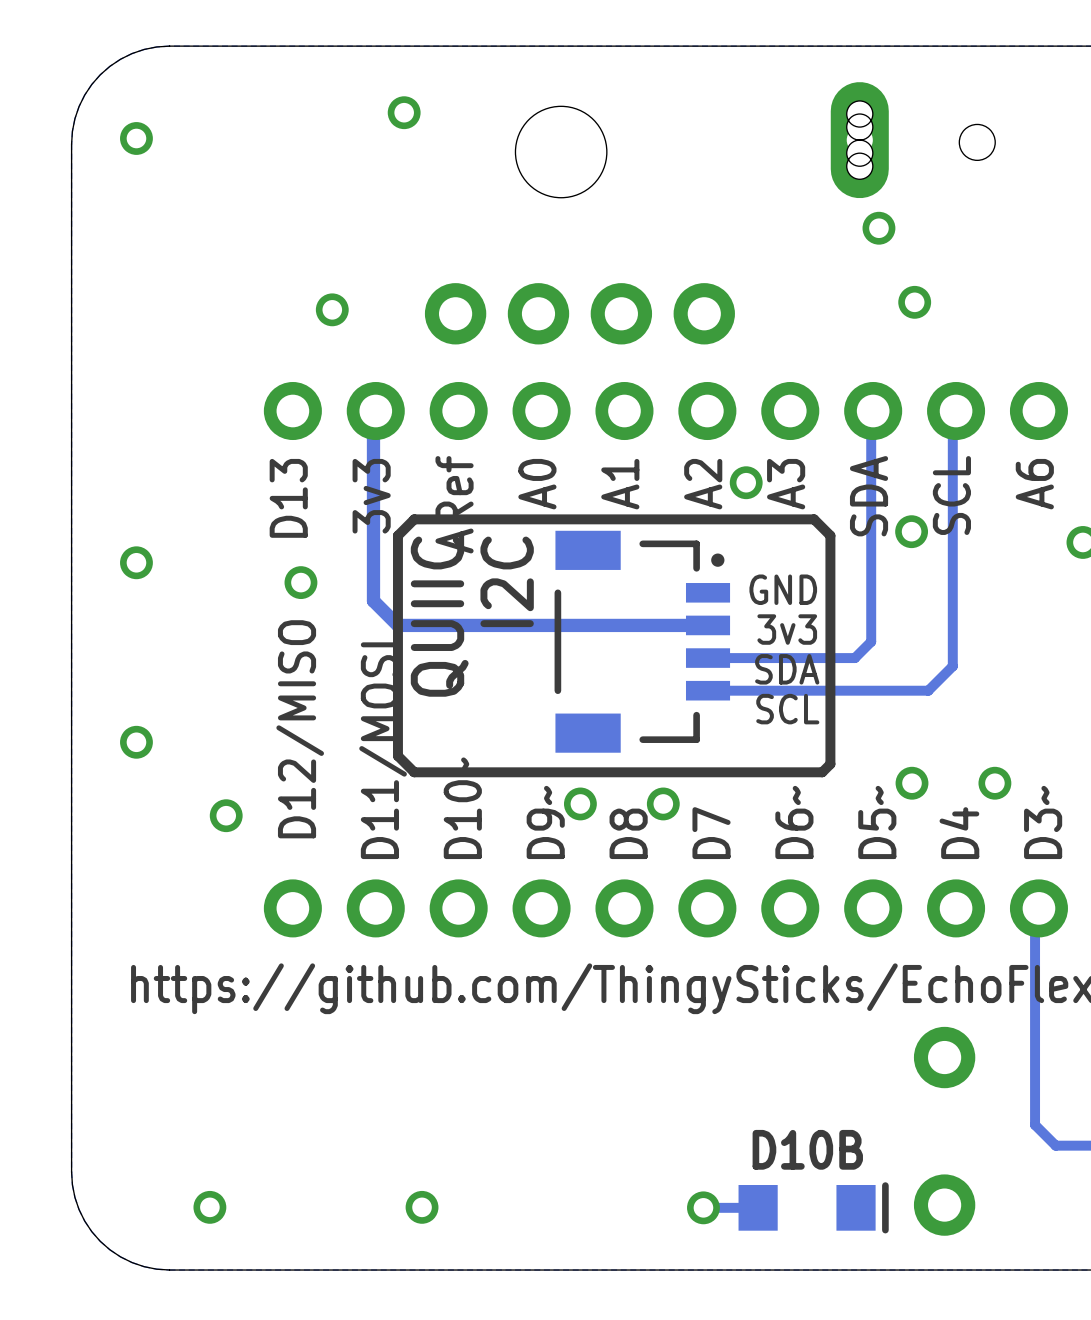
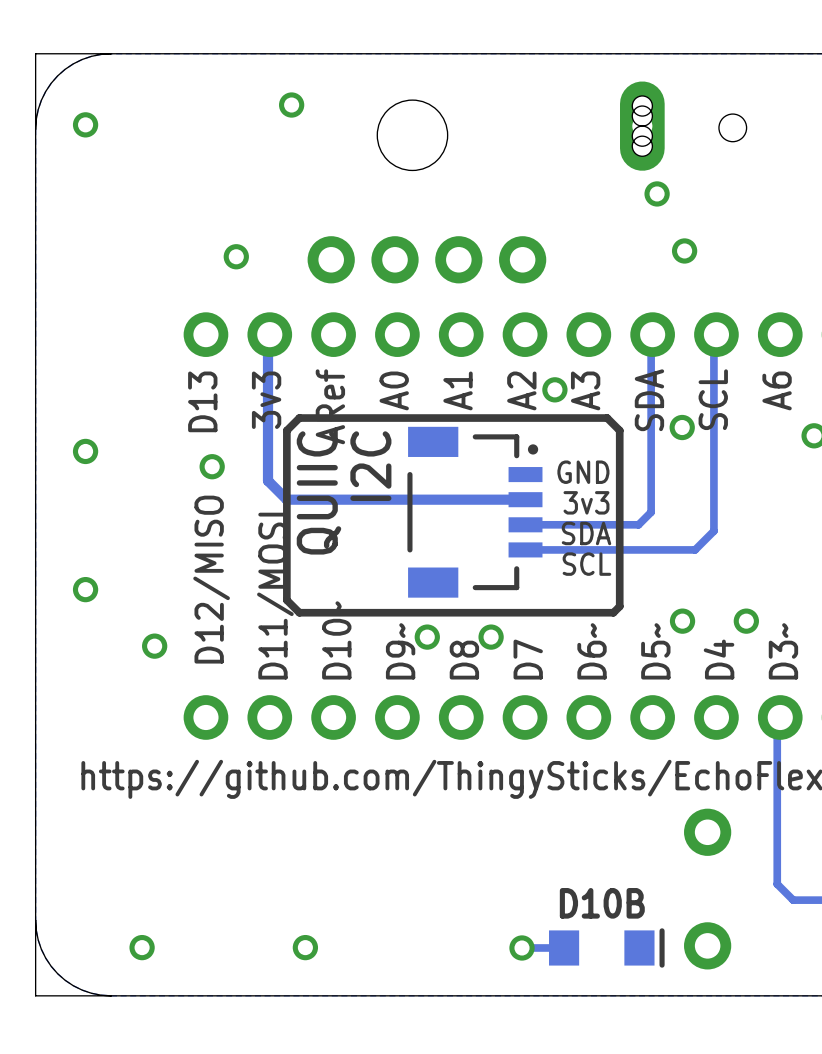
board edge: none -> (111, 53) (35, 53) (35, 129)
board edge: none -> (35, 920) (35, 995) (111, 995)

